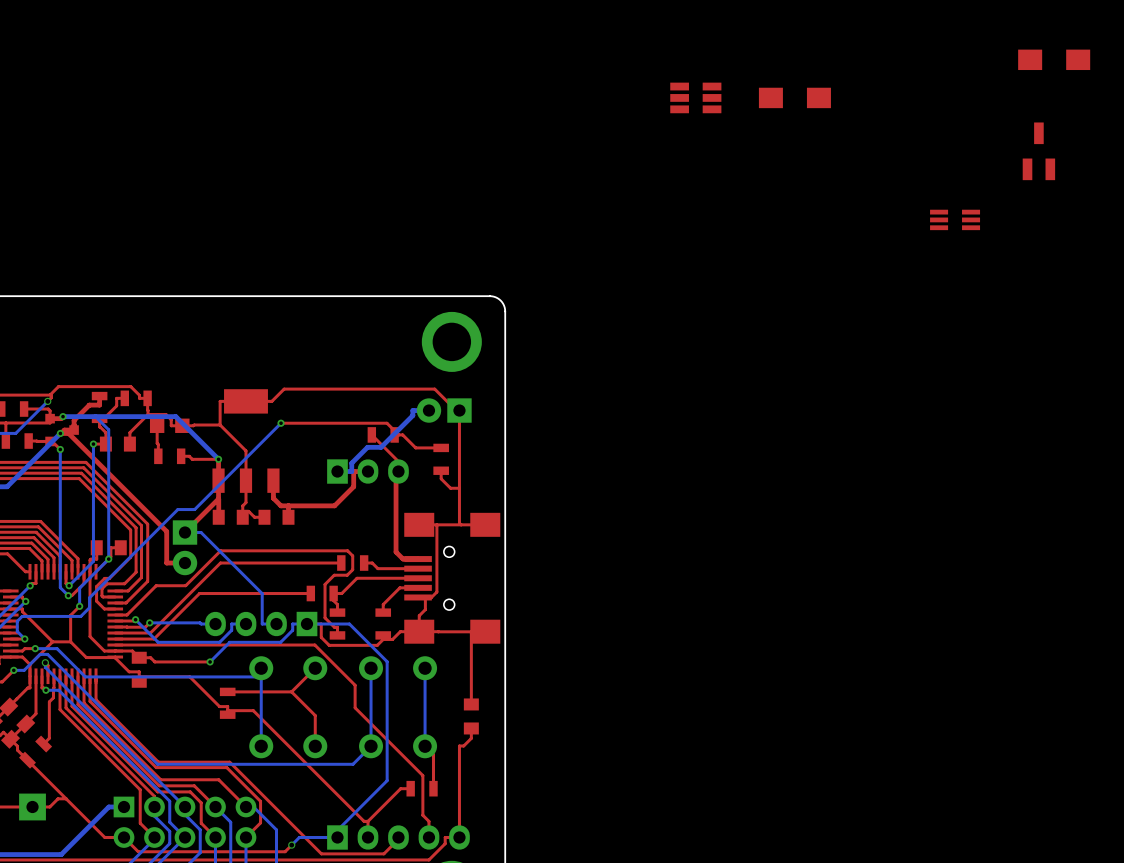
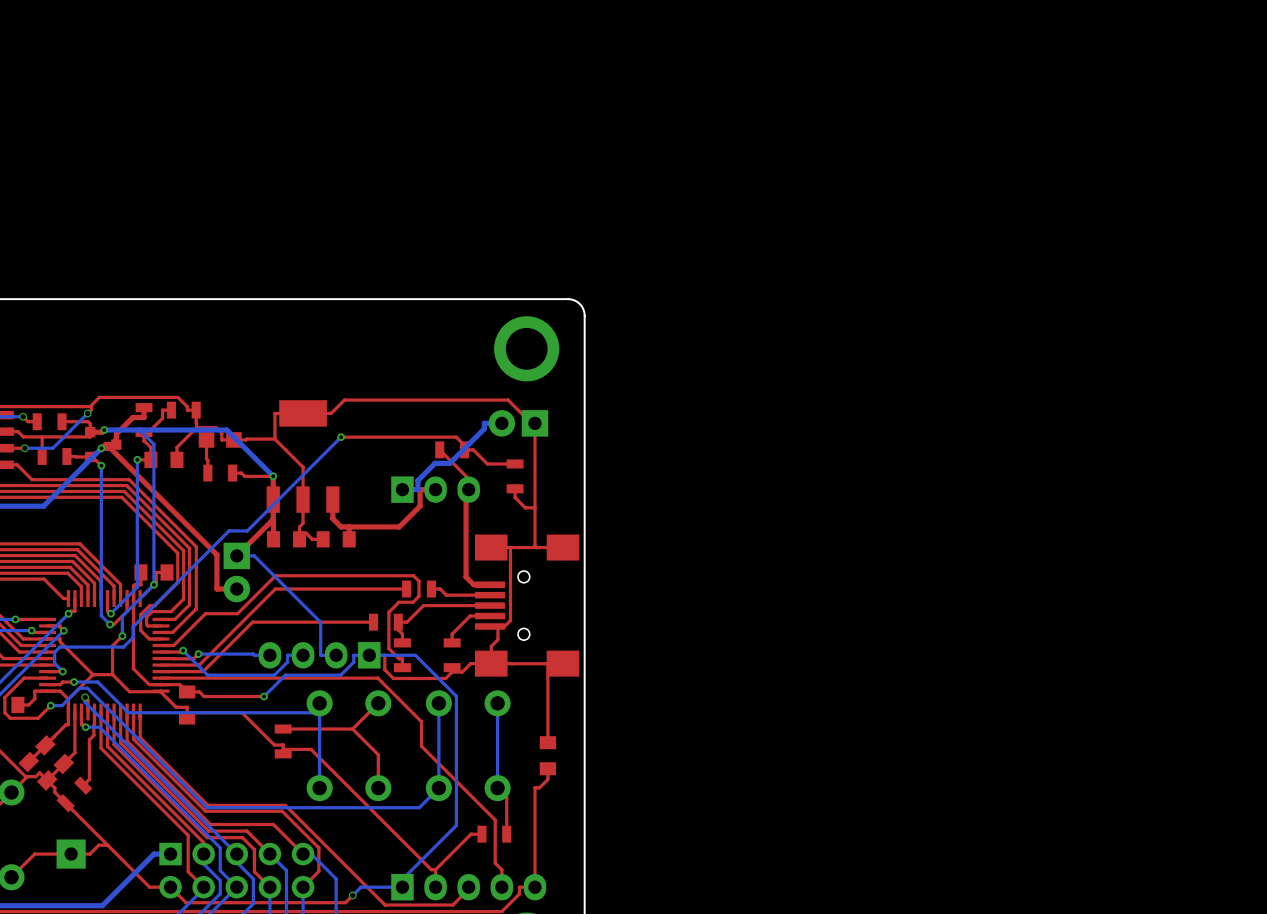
part: (1054, 59) -> none
part: (695, 97) -> none
part: (794, 97) -> none
part: (1038, 151) -> none
part: (955, 219) -> none

